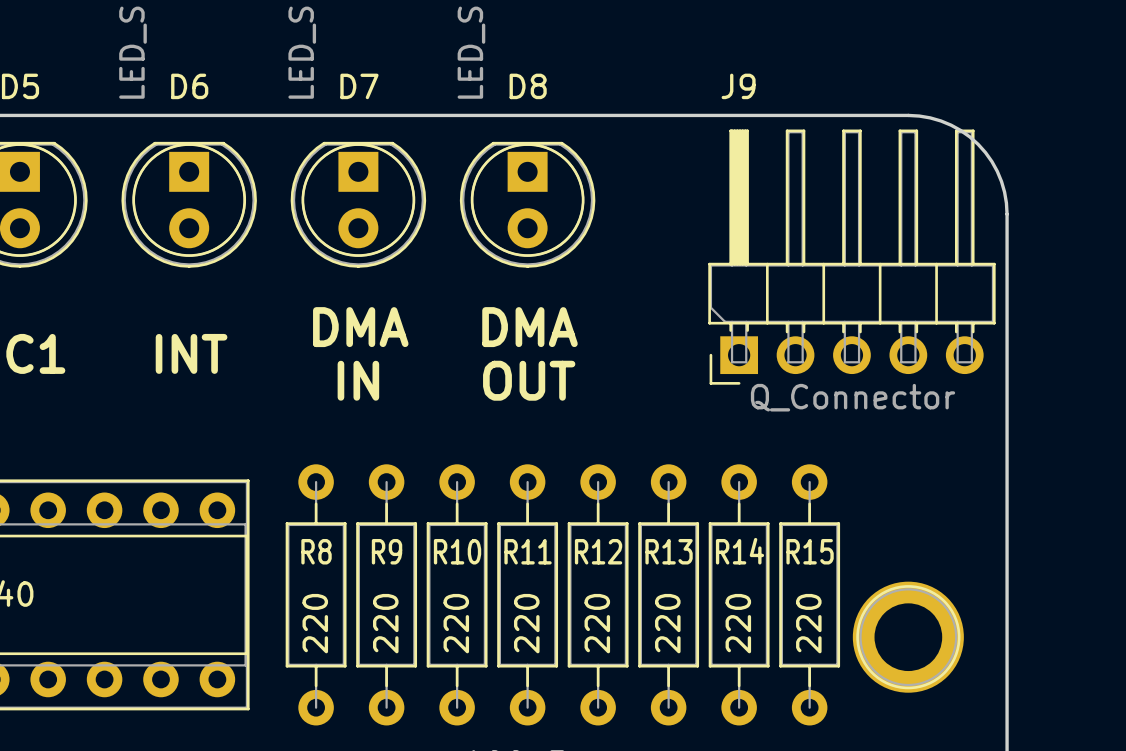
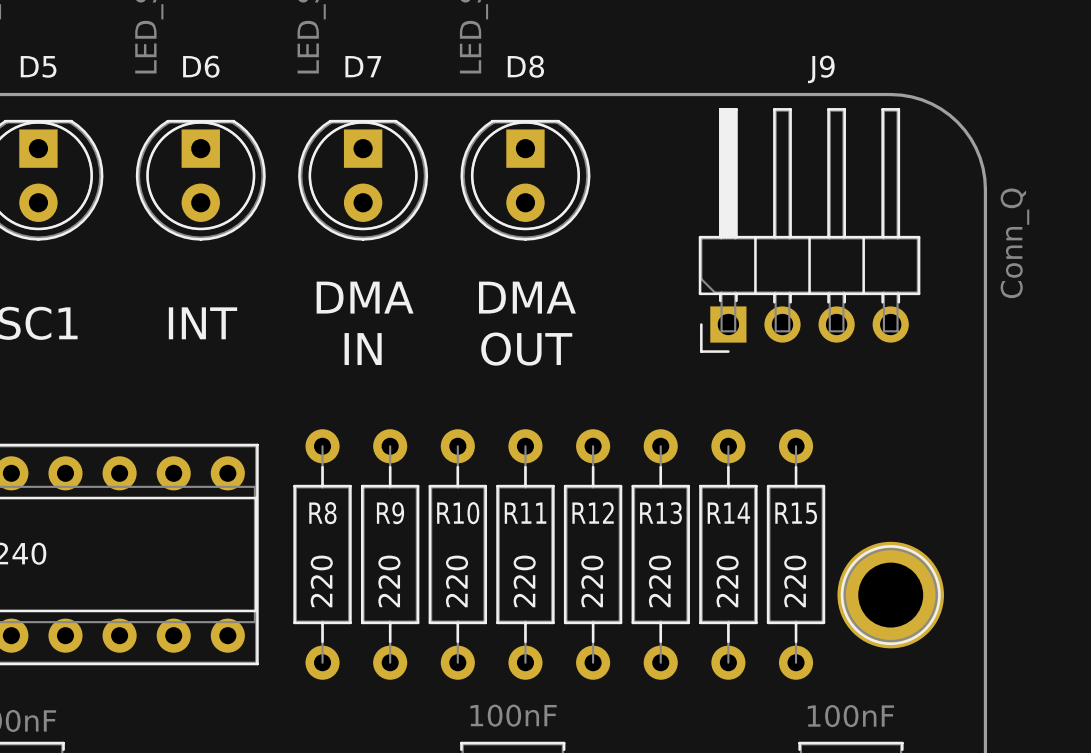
J9 name position: J9 (738, 86) -> J9 (821, 69)
J9 footprint: [708, 129, 996, 385] -> [698, 108, 921, 353]
J9 value: Q_Connector (853, 397) -> Conn_Q (1014, 243)

